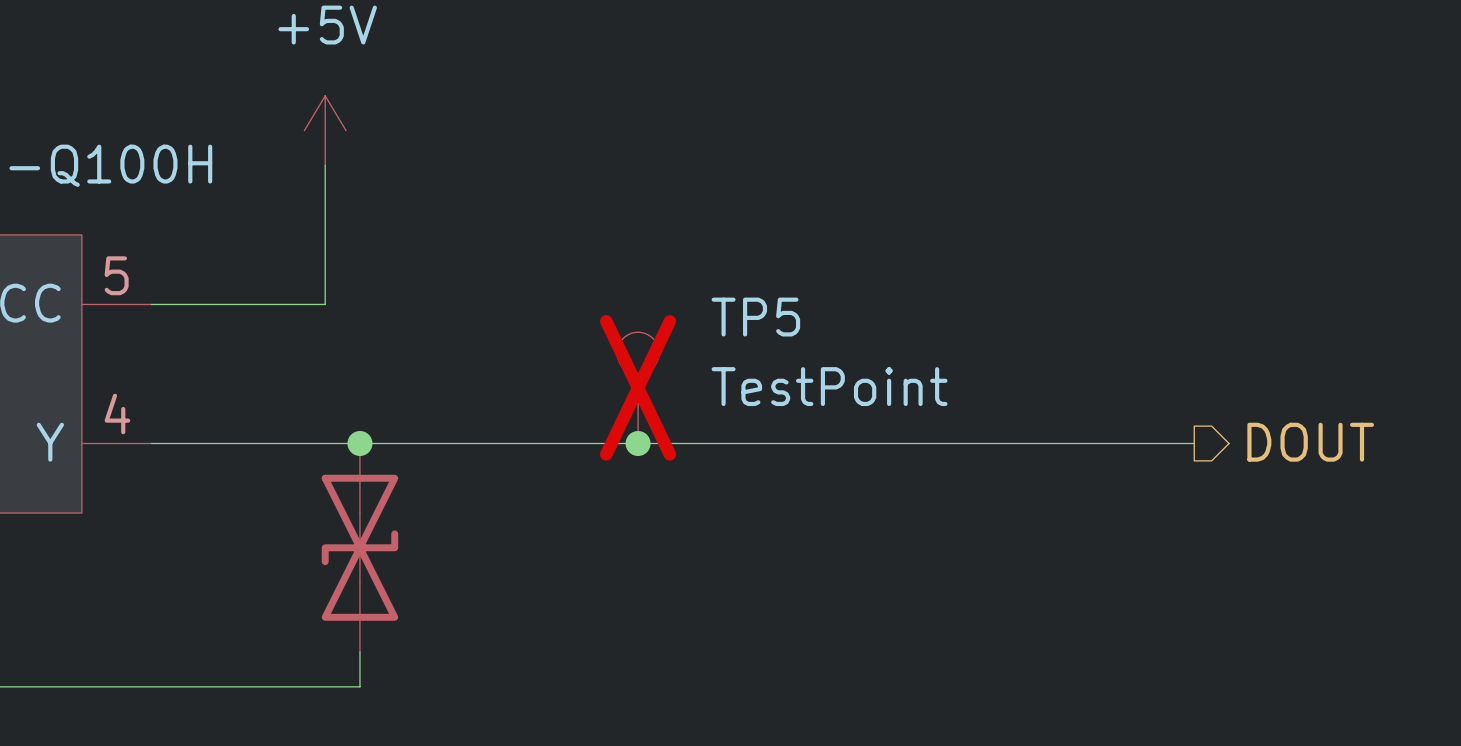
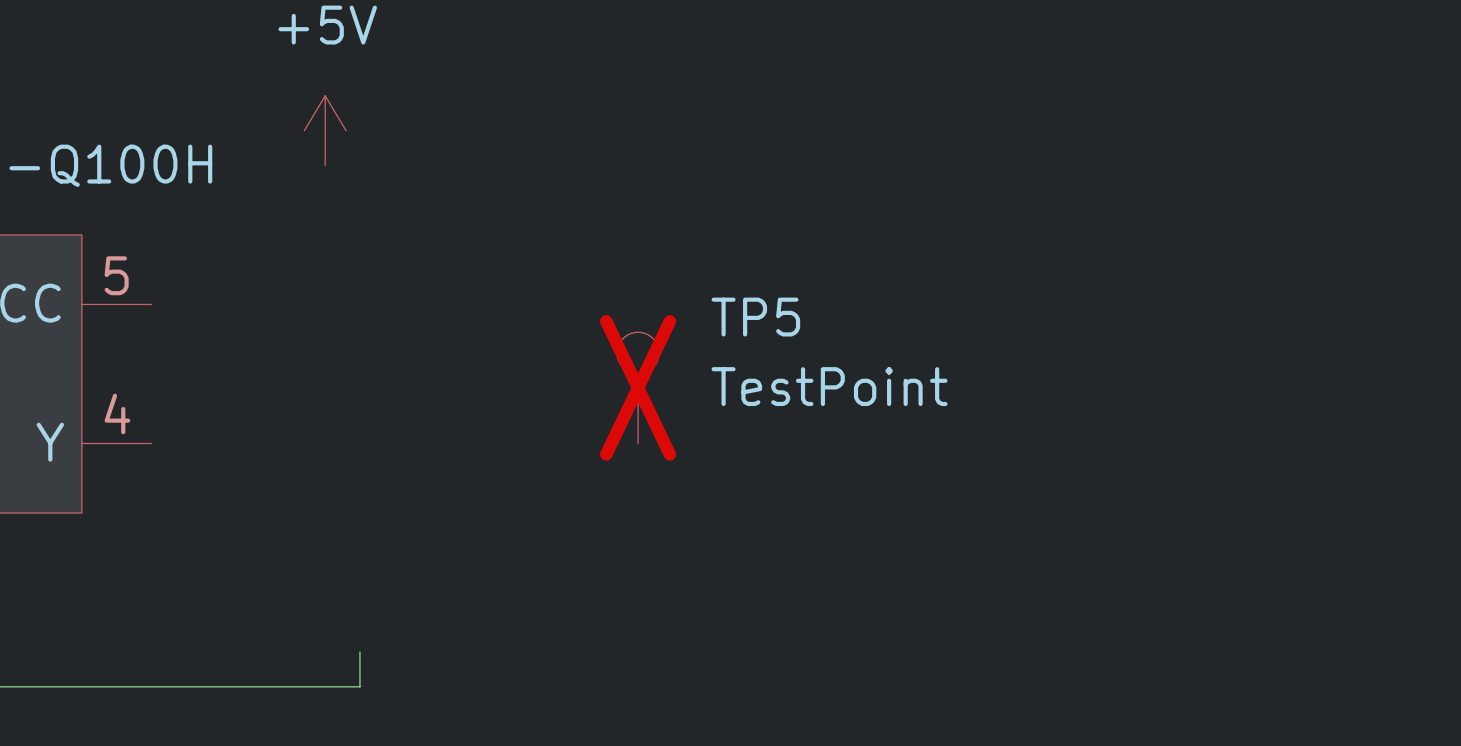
wire: (325, 165) (325, 304) (151, 304) -> none
hierarchical label: DOUT (1310, 442) -> none
wire: (151, 443) (1194, 443) -> none
junction: (359, 443) -> none
junction: (638, 443) -> none
part: (359, 547) -> none

